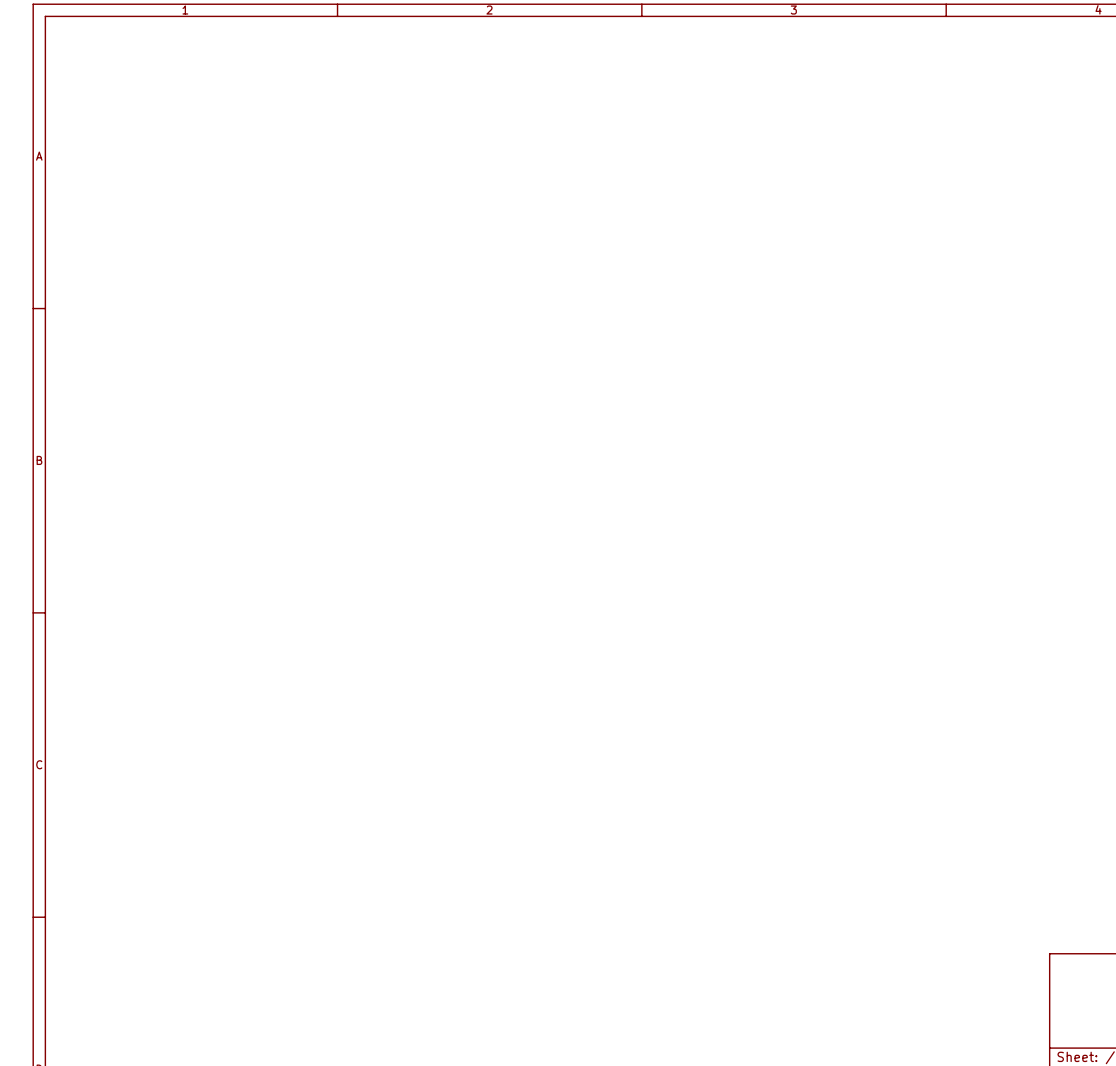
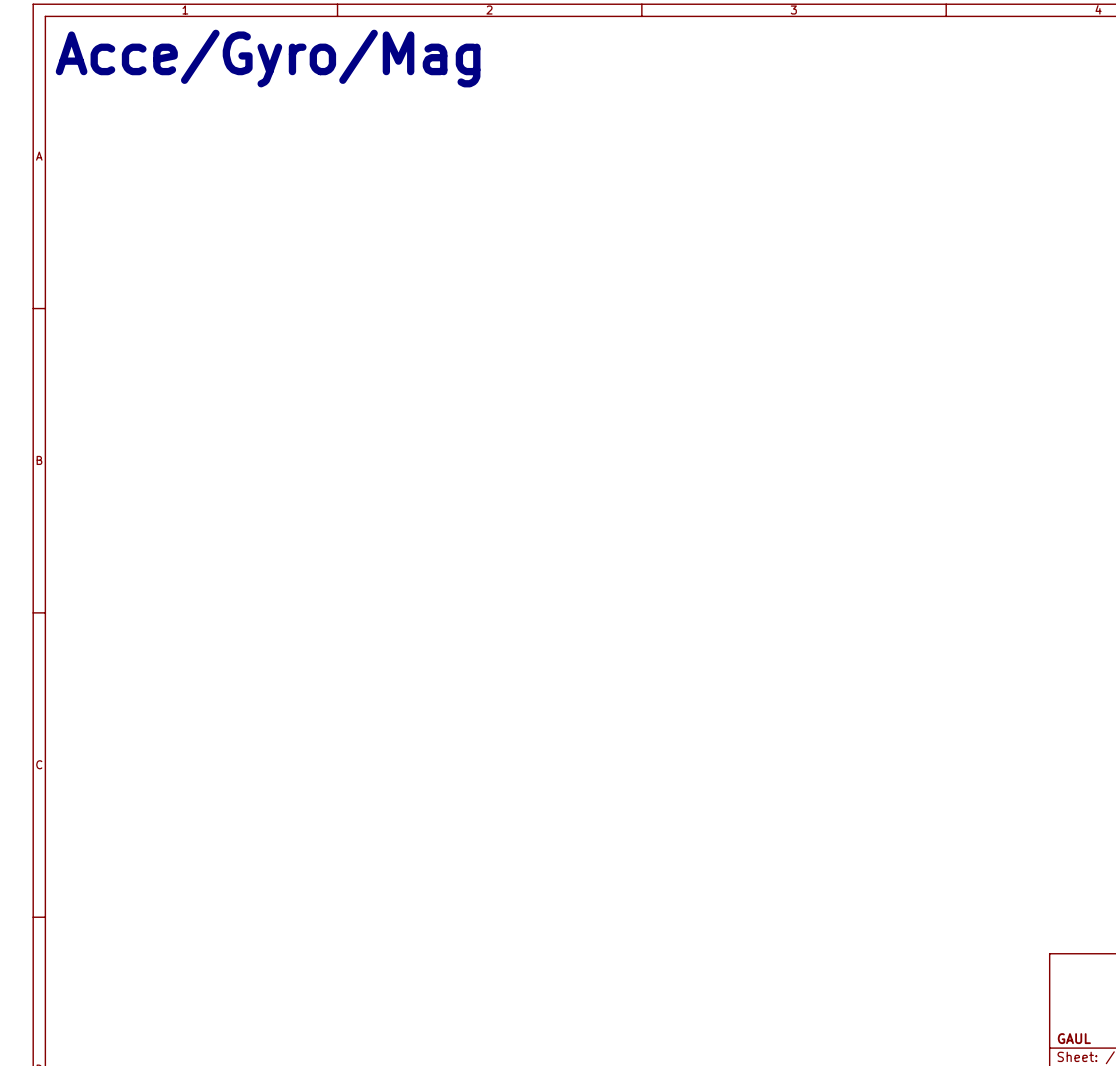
text: none -> Acce/Gyro/Mag (268, 58)
title block: none -> GAUL (1074, 1038)

